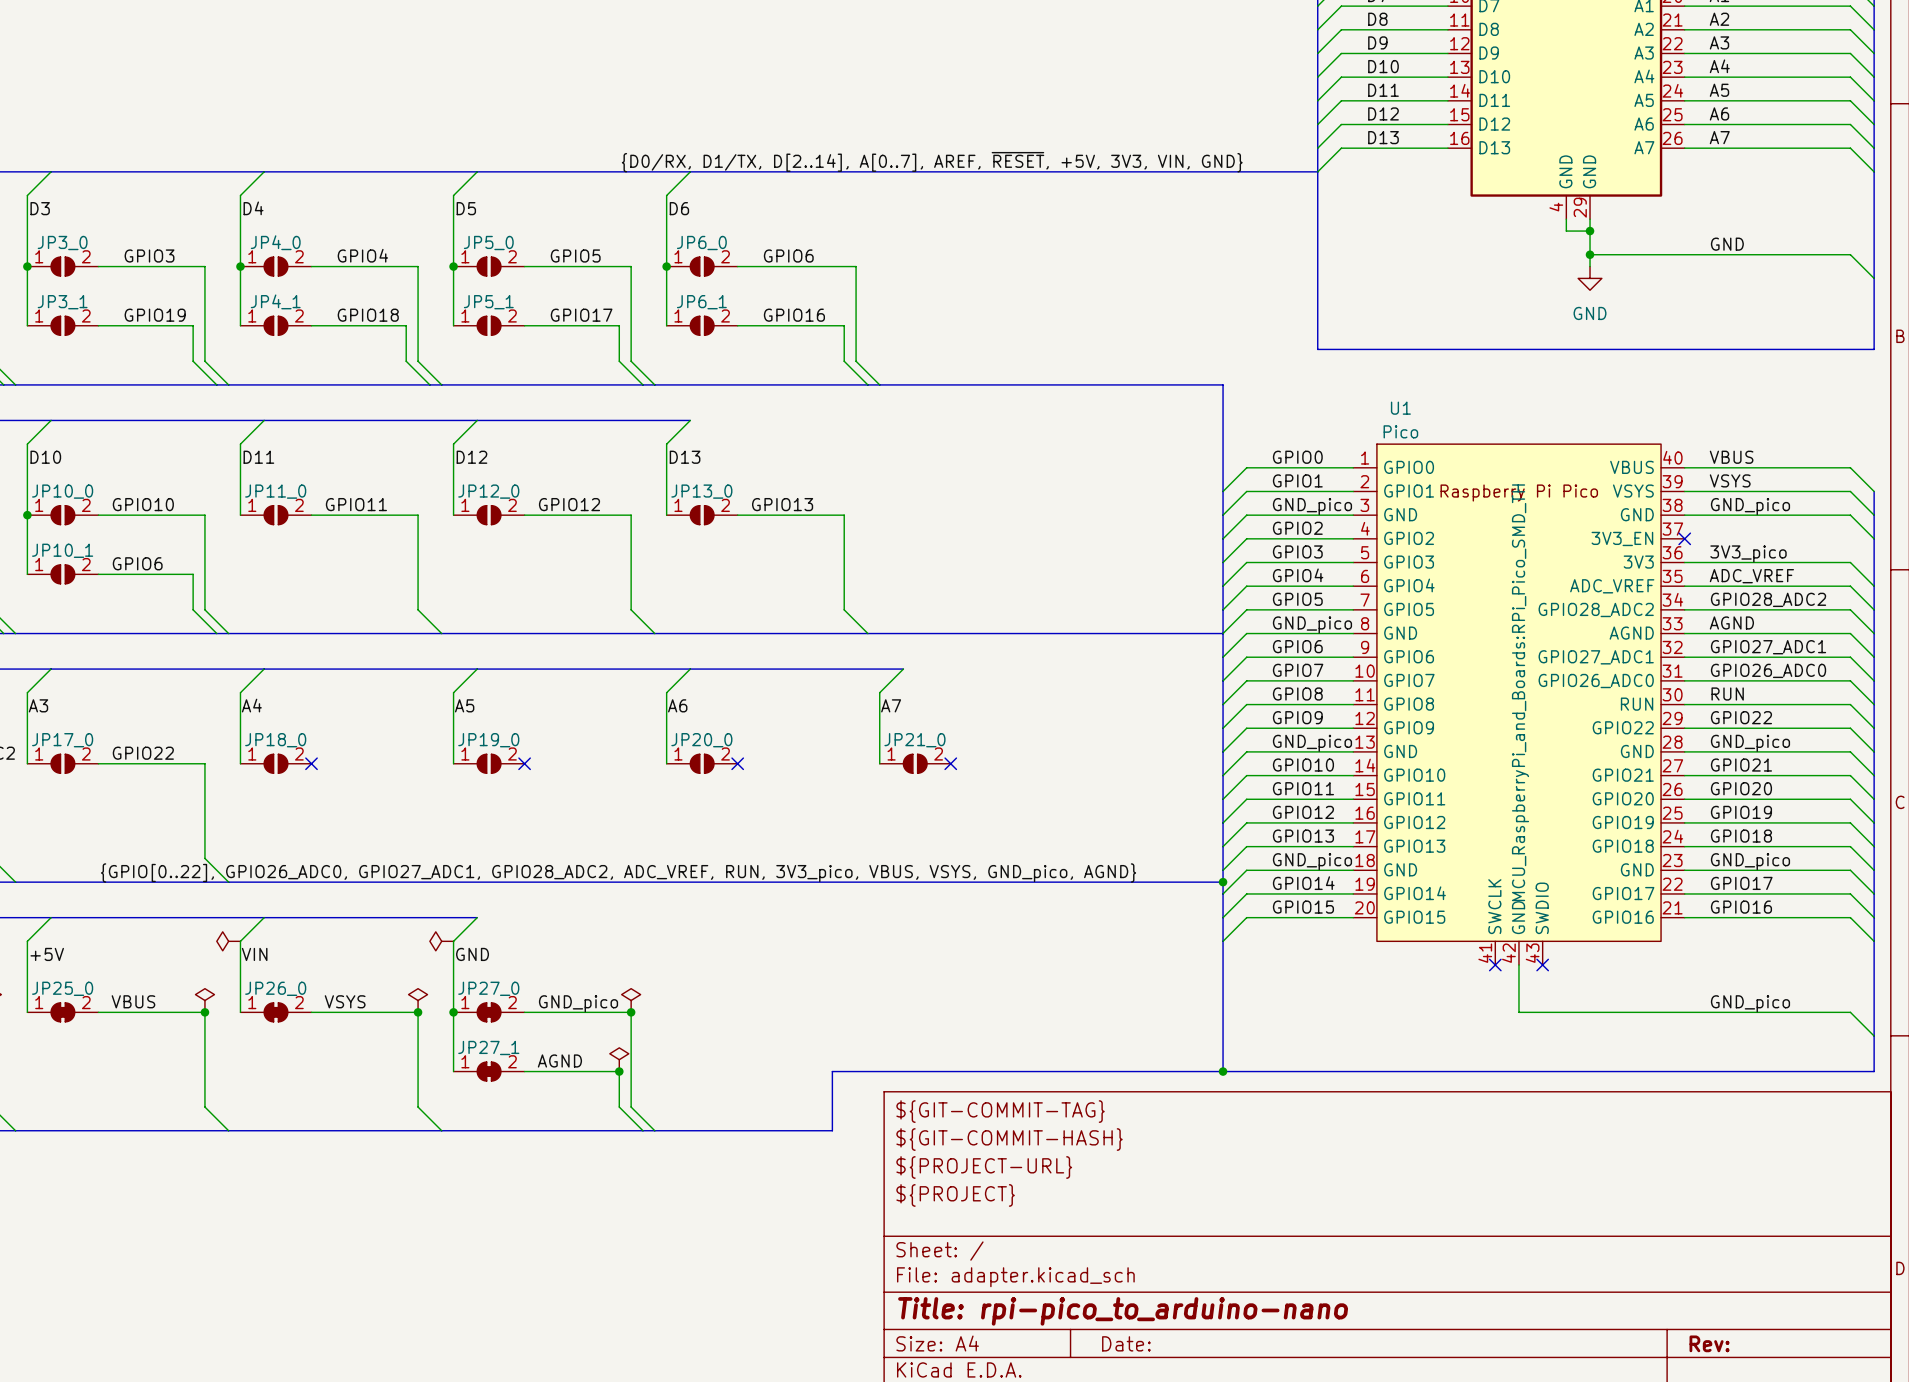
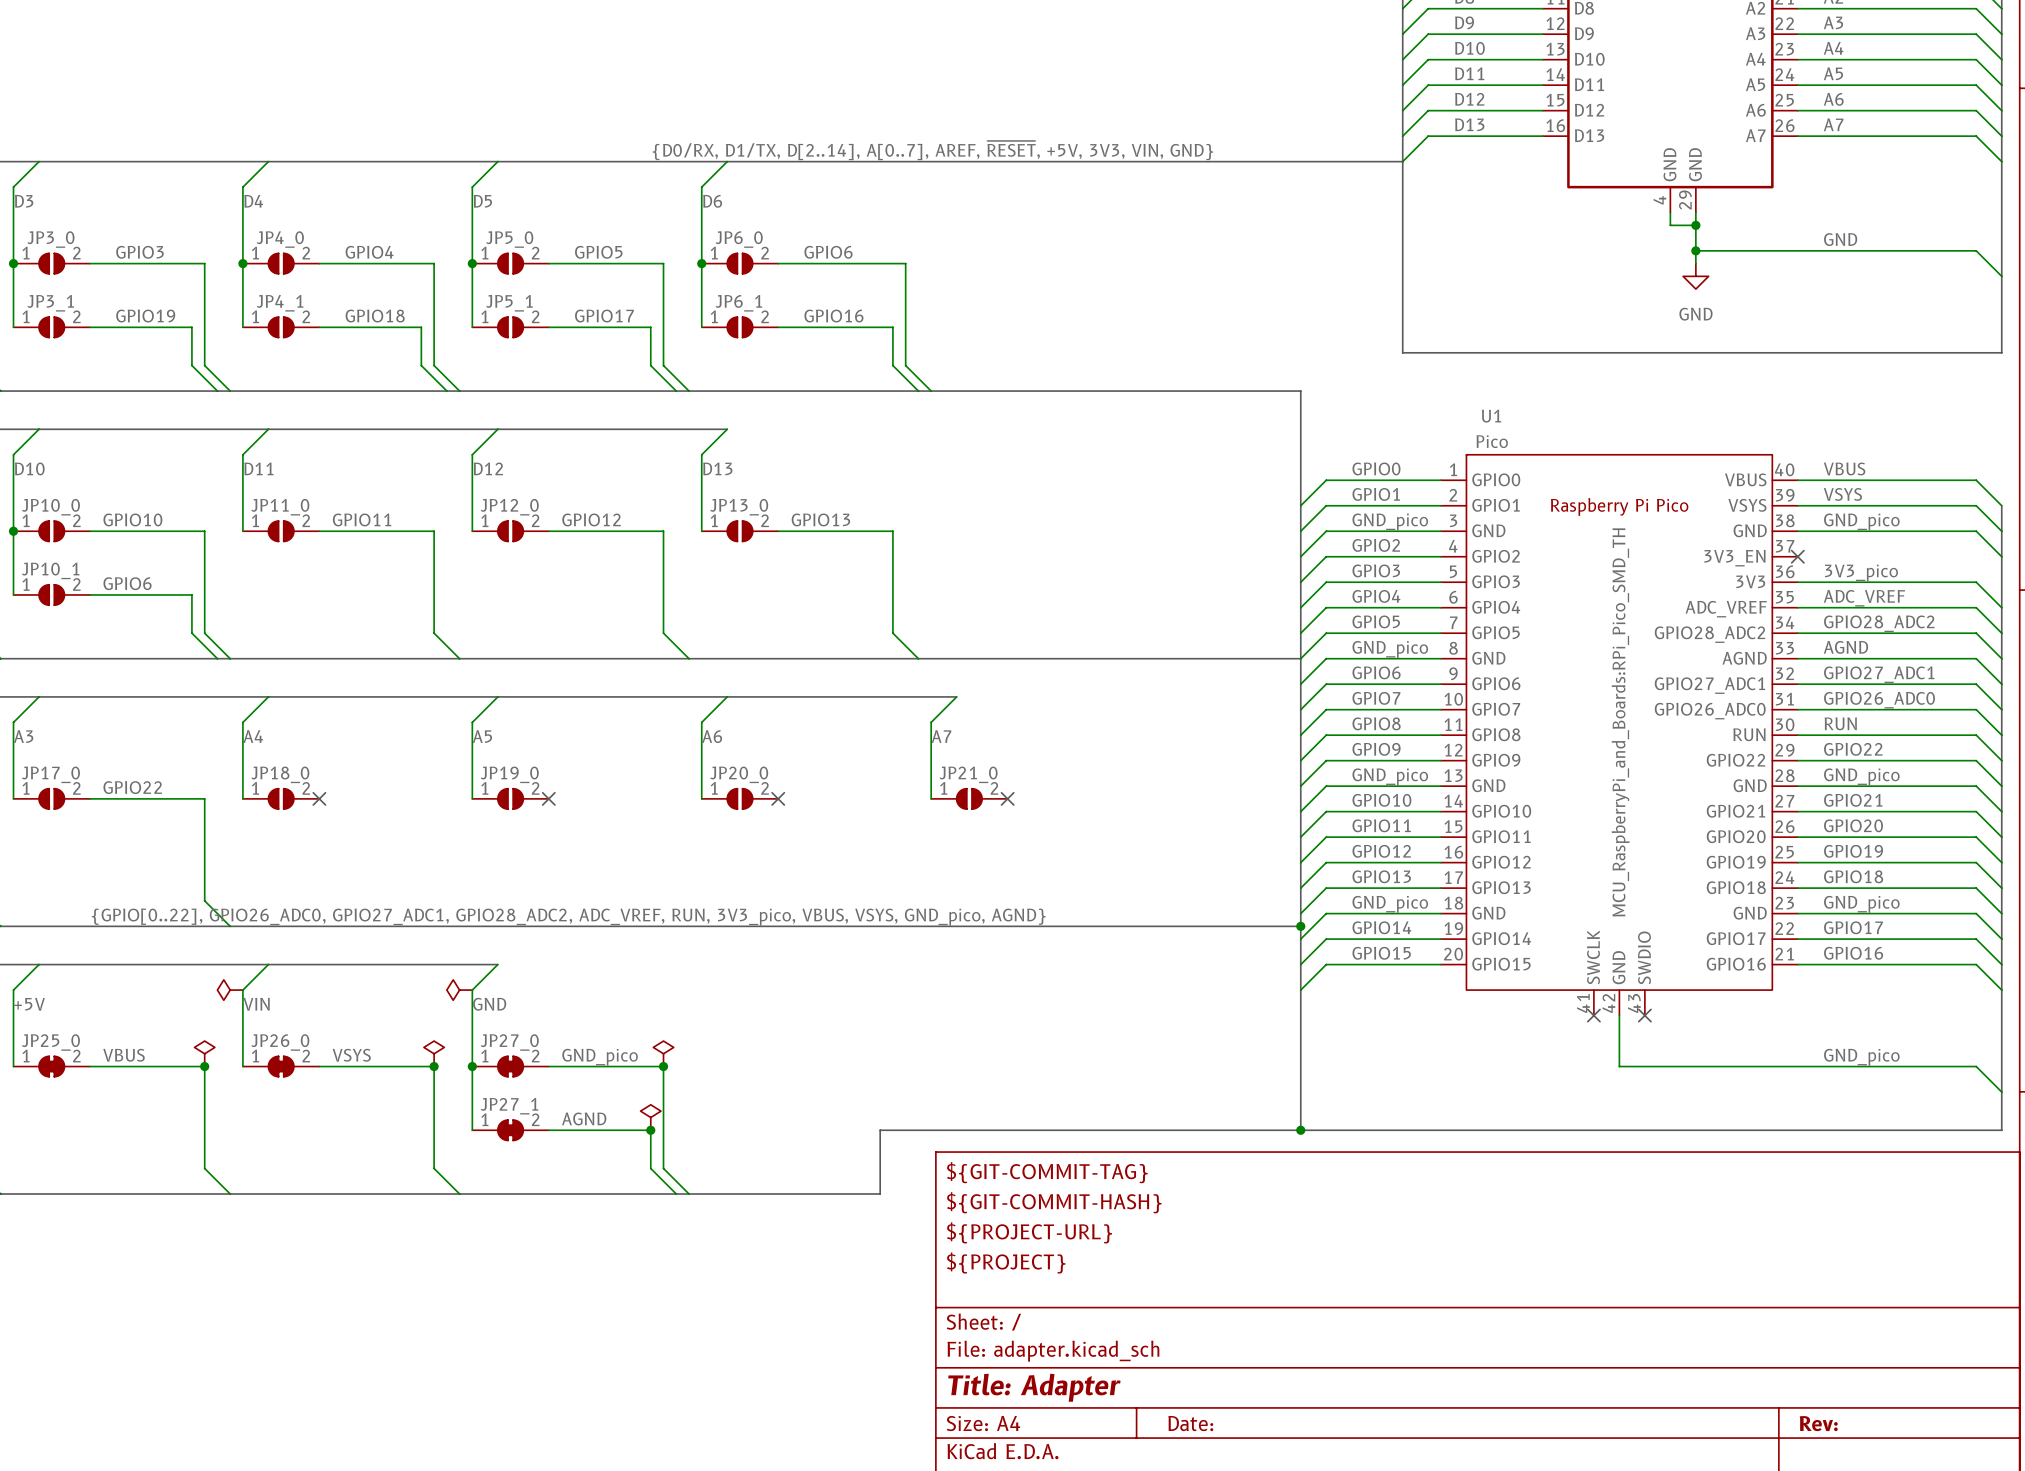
title block: Title: rpi-pico_to_arduino-nano (1123, 1311) -> Title: Adapter (1034, 1387)

